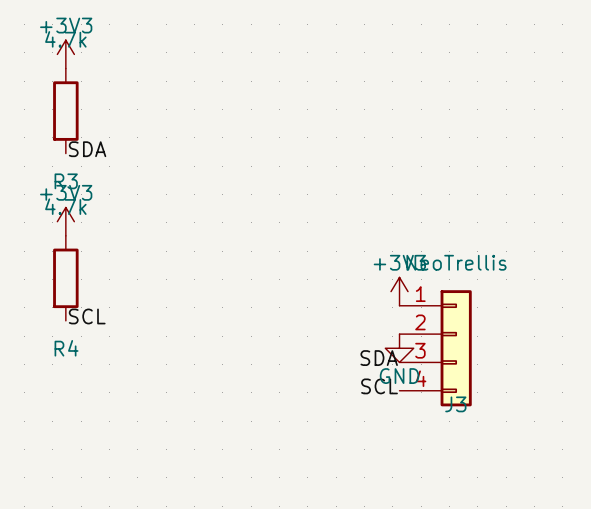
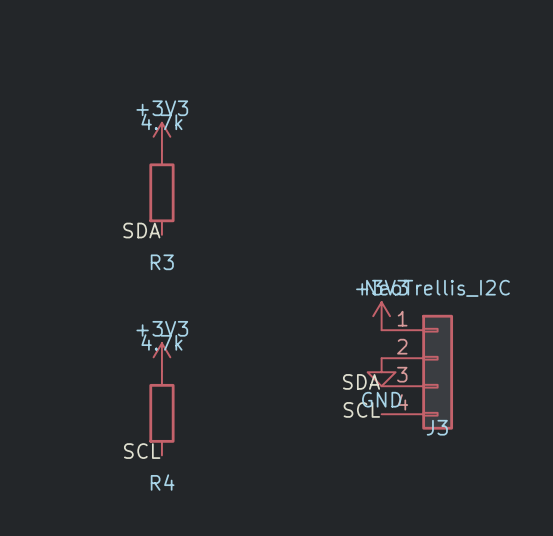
power symbol: +3V3 (65, 54) -> none
power symbol: none -> +3V3 (161, 136)
R3 position: (65, 111) -> (161, 192)
label position: SDA (87, 149) -> SDA (141, 230)
power symbol: +3V3 (65, 221) -> none
J3 value: NeoTrellis (456, 262) -> NeoTrellis_I2C (437, 288)
R4 position: (65, 278) -> (161, 413)
label position: SCL (87, 316) -> SCL (142, 451)
power symbol: none -> +3V3 (161, 357)

